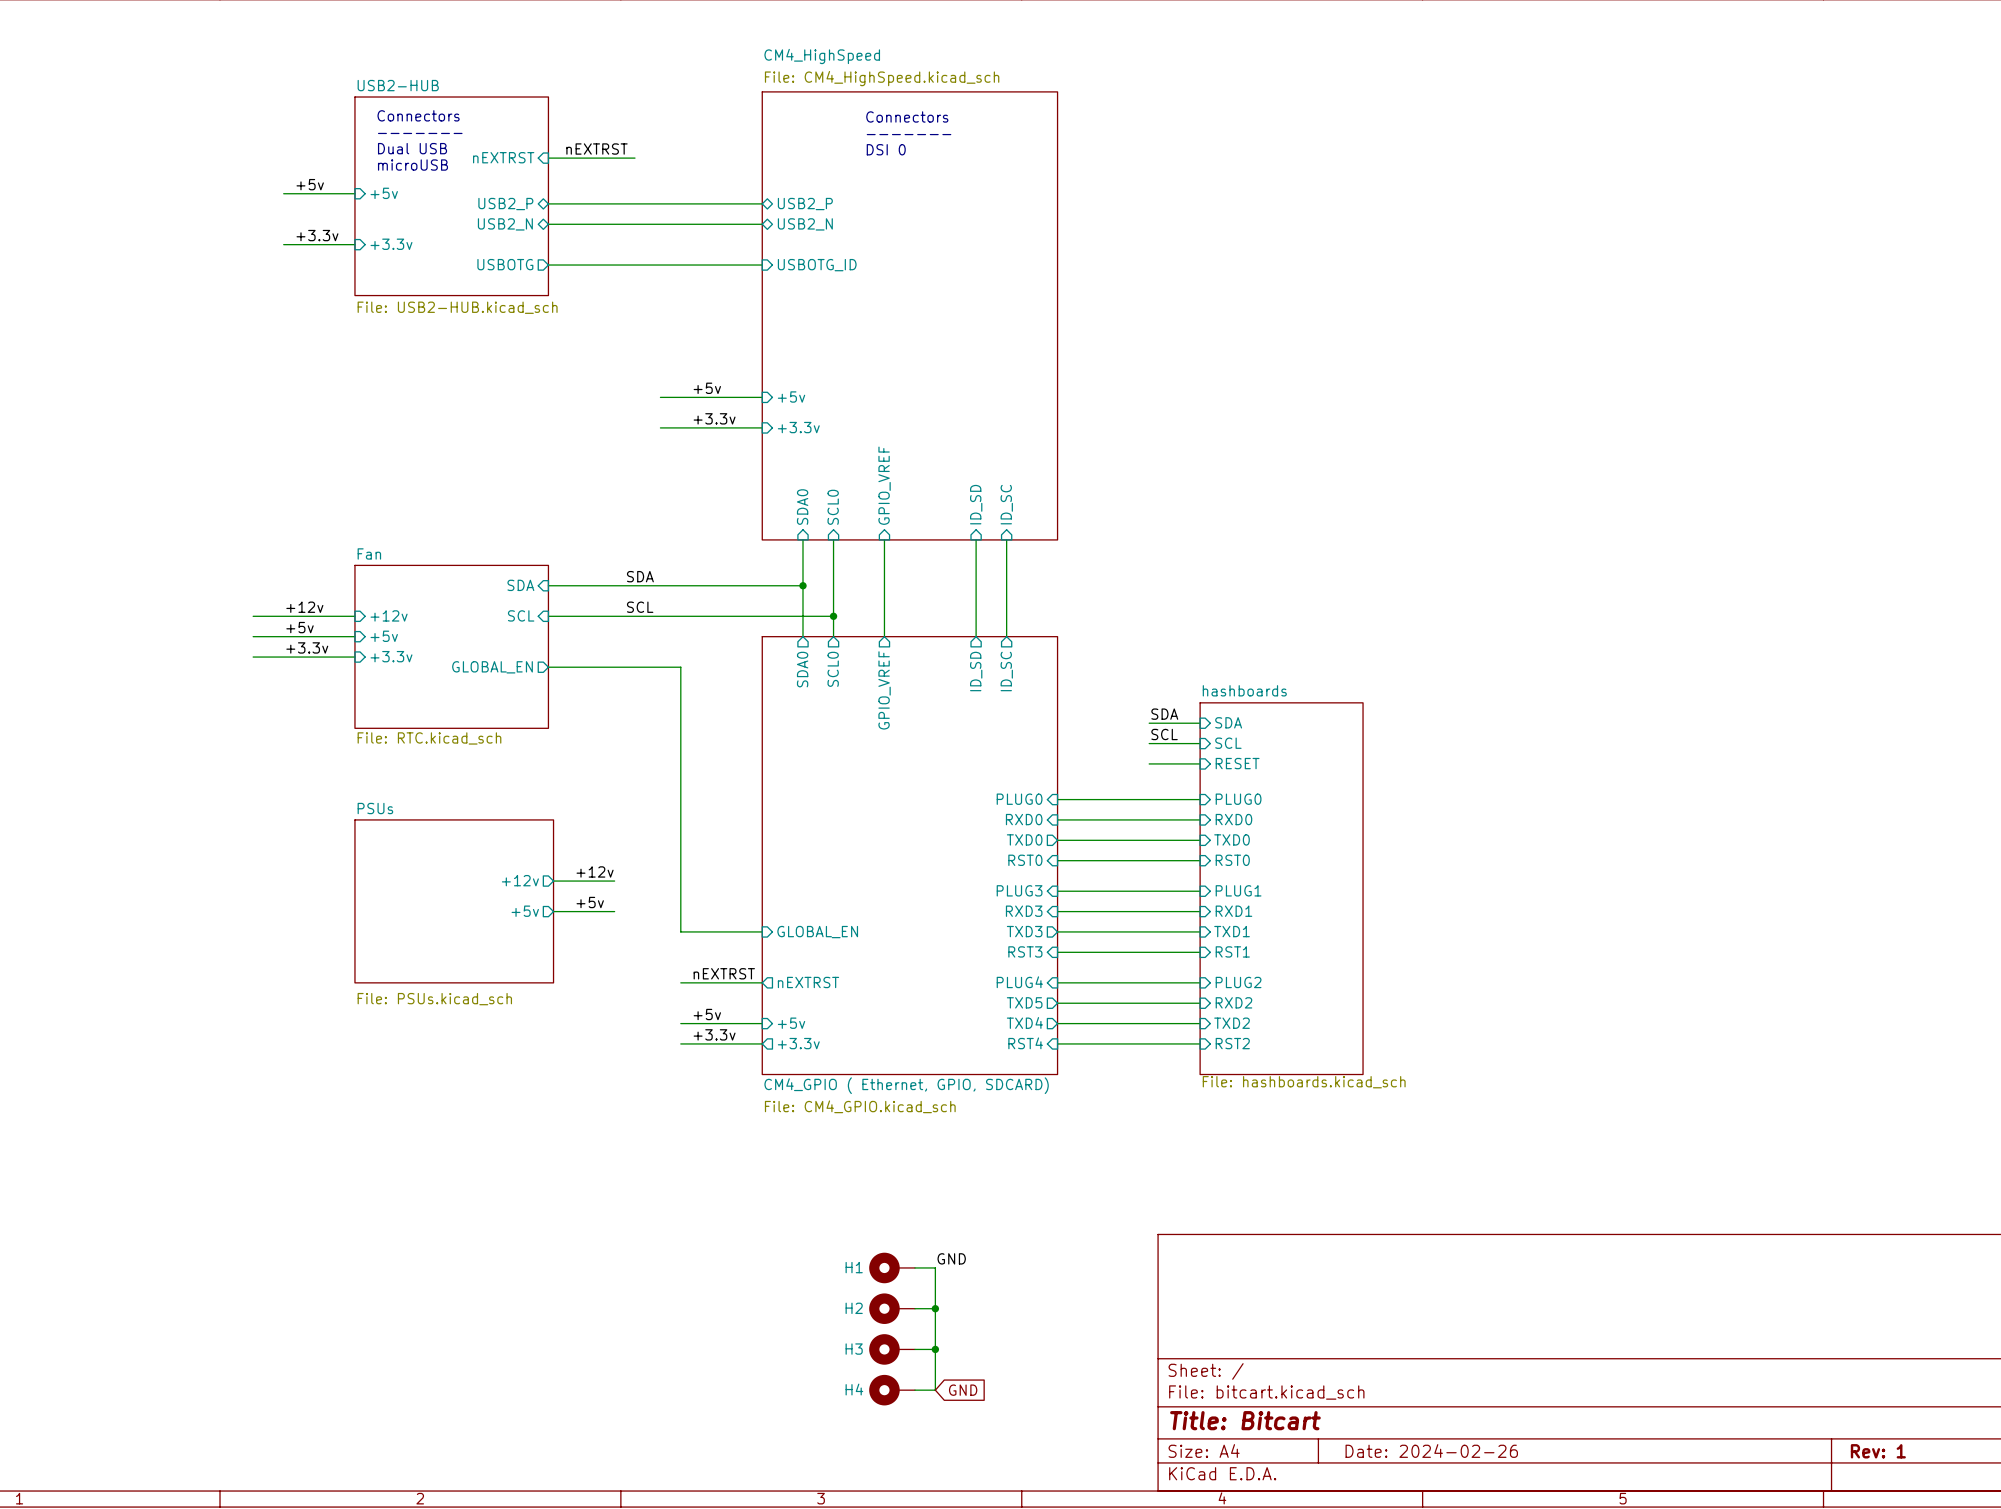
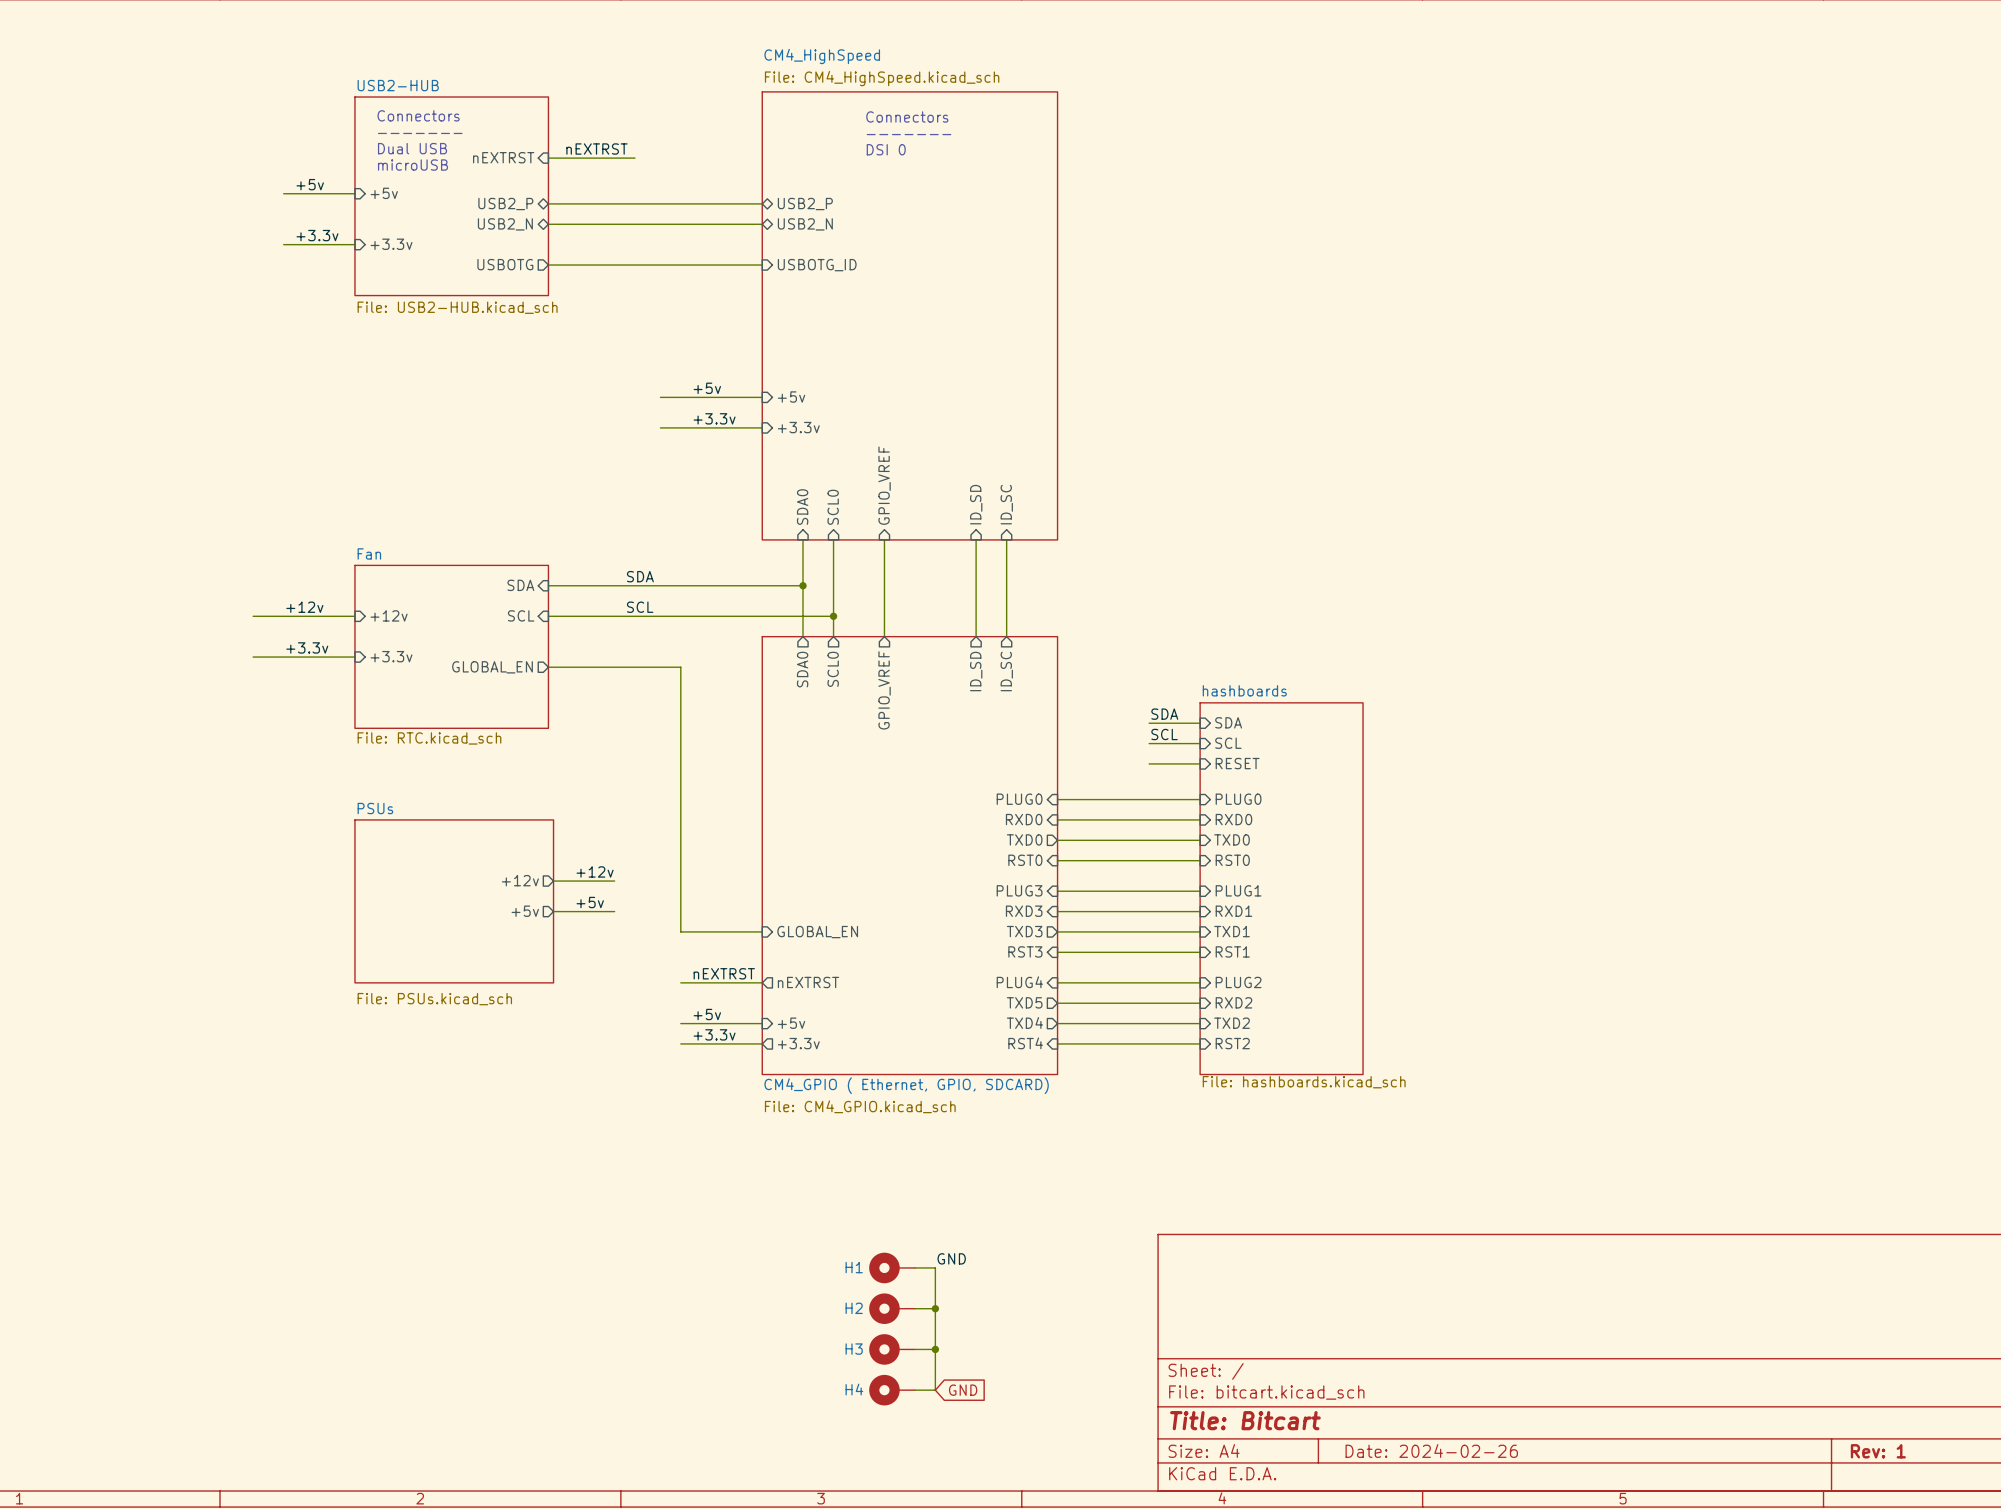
label: +5v (300, 627) -> none
wire: (253, 636) (354, 636) -> none
sheet pin: +5v (384, 636) -> none

